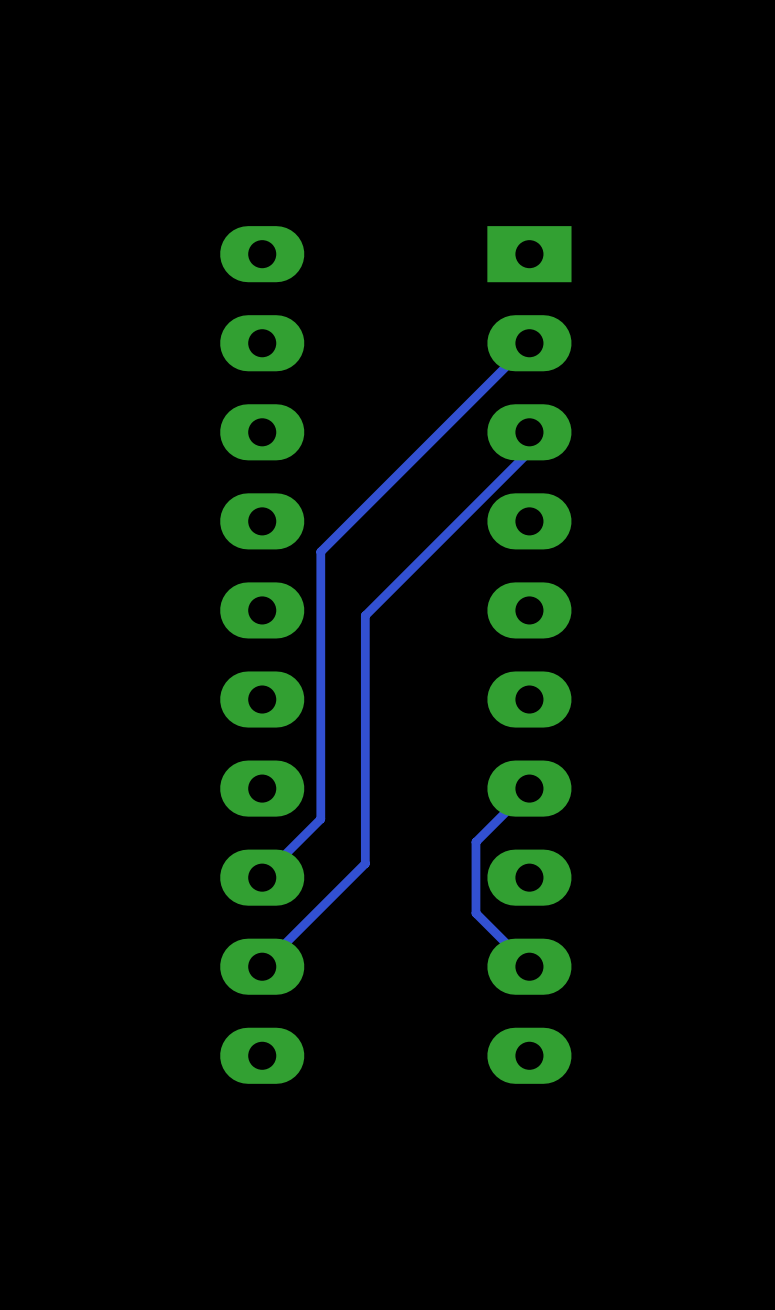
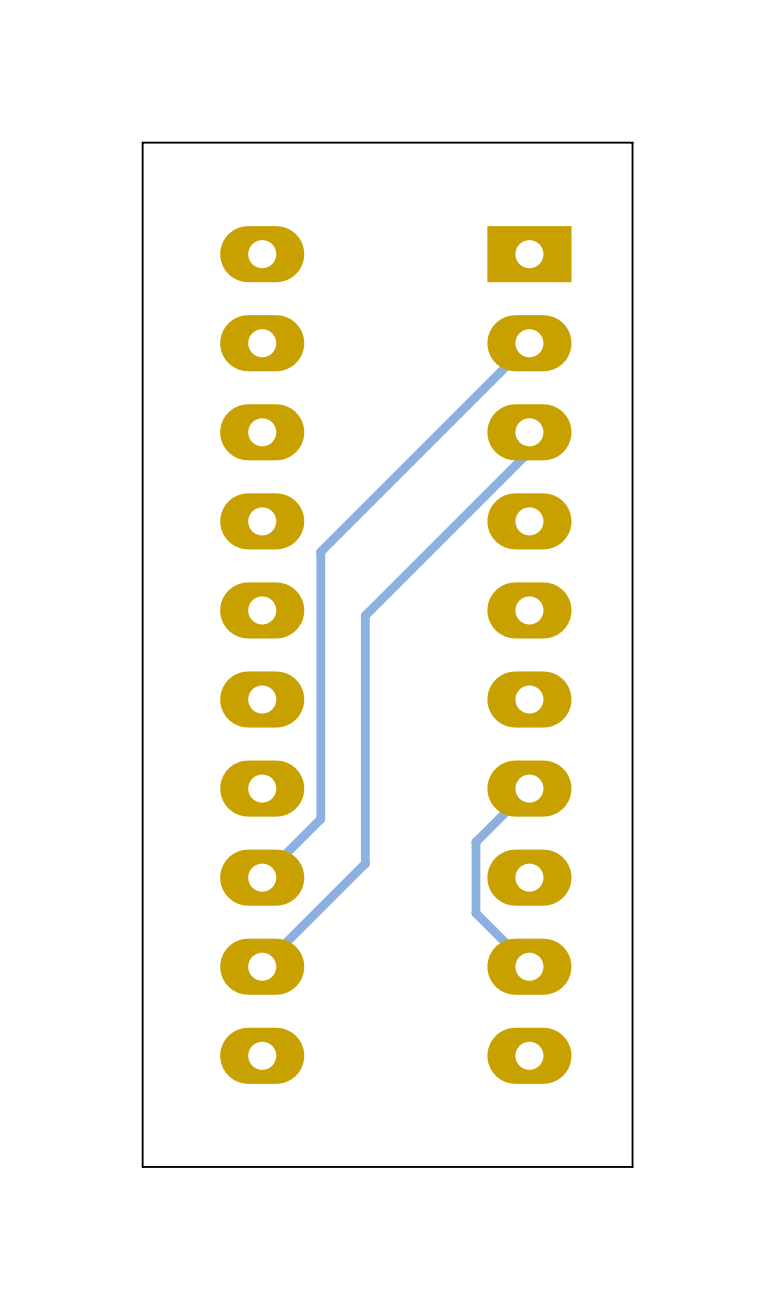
board edge: none -> (632, 142) (632, 1166) (142, 1166) (142, 142) (632, 142)

